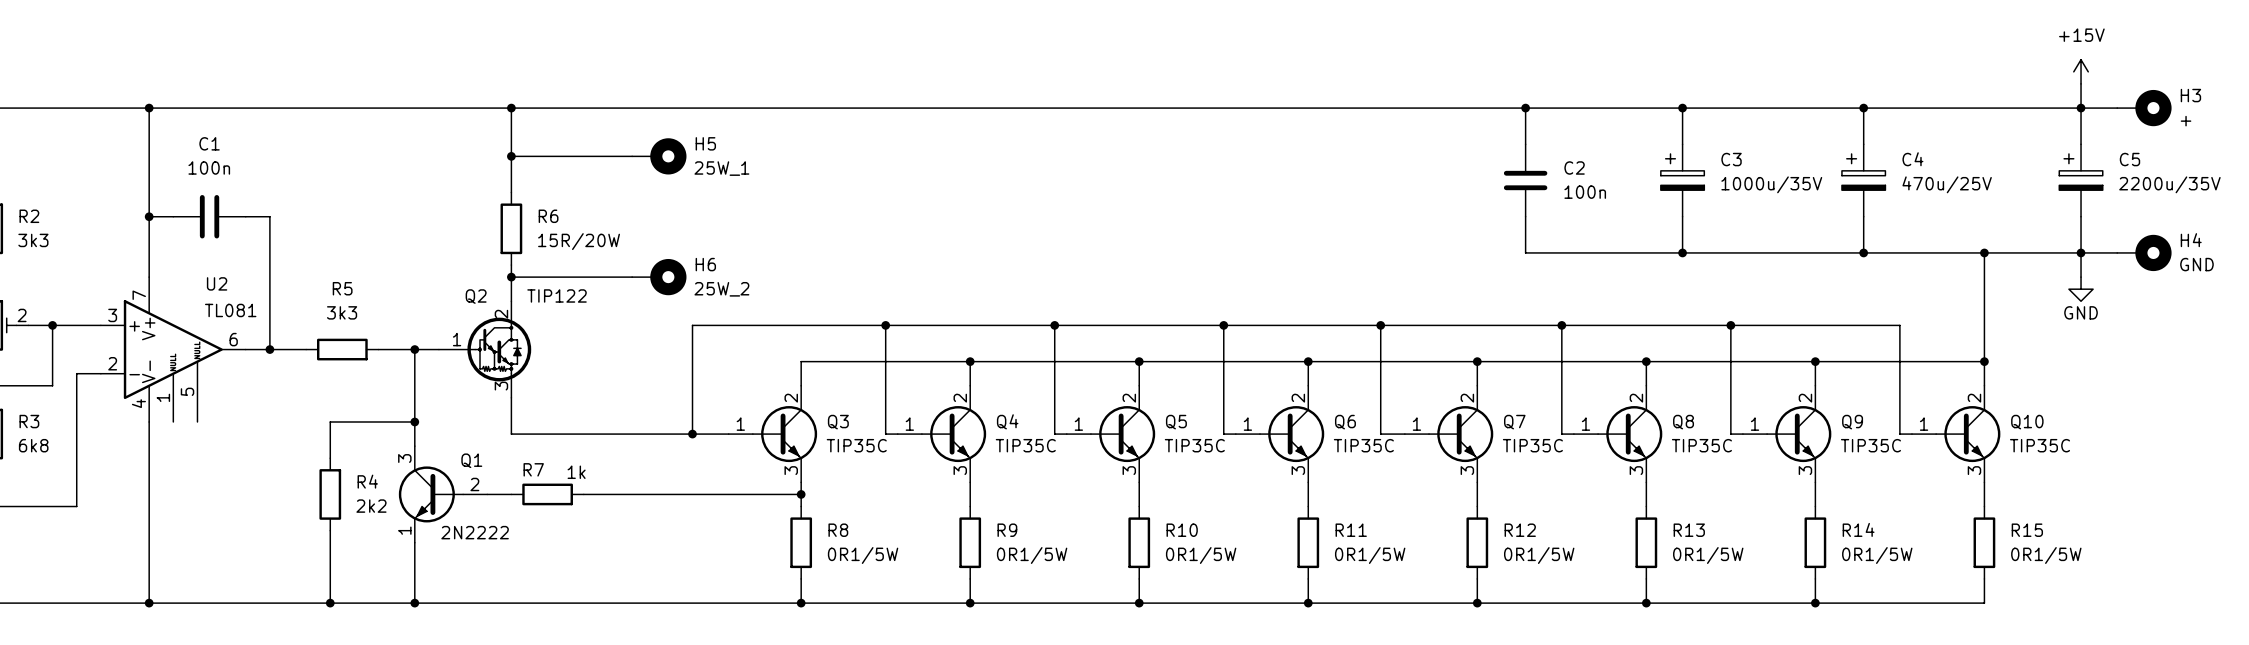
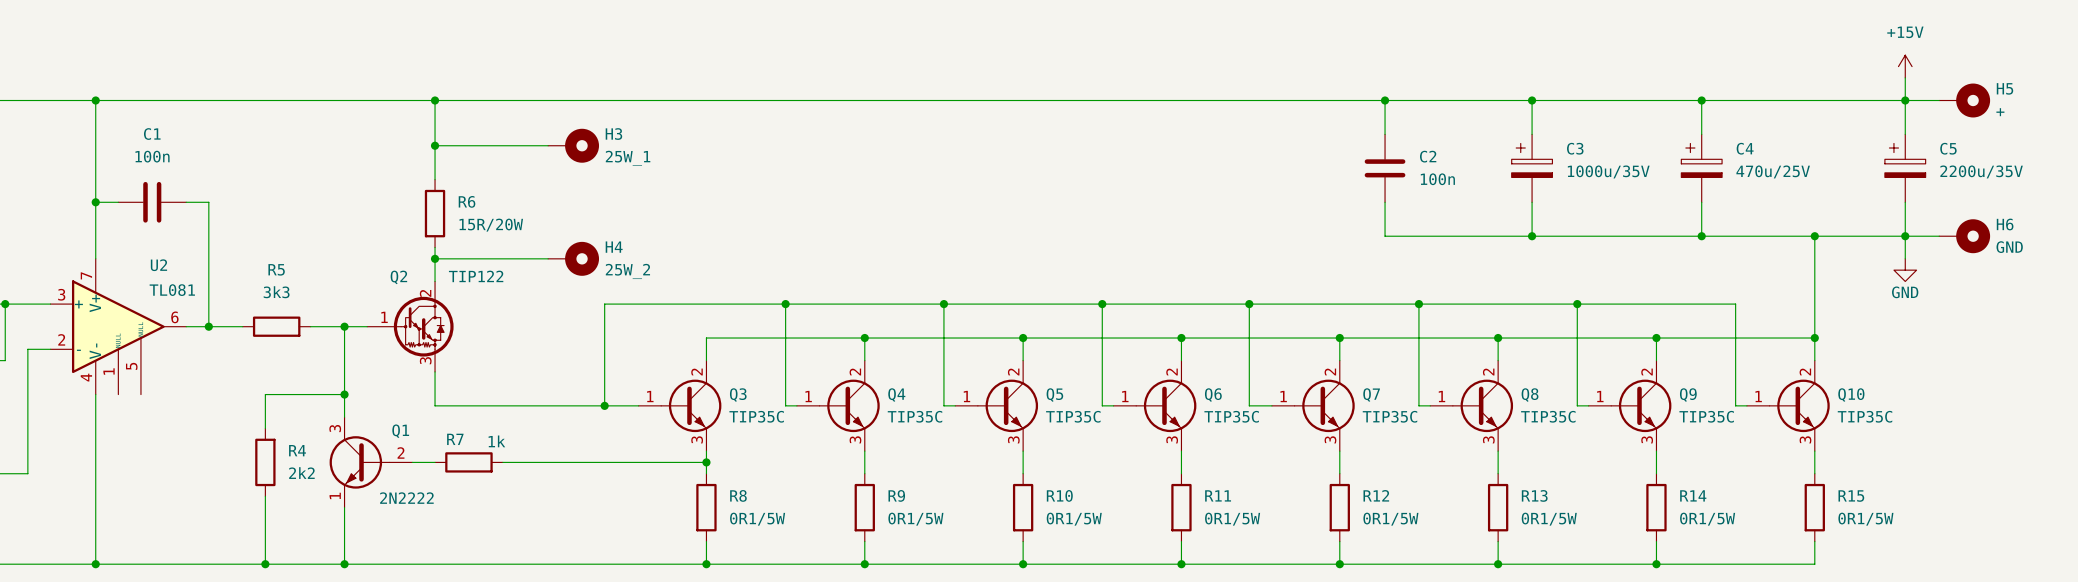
H3 name: H3 (2190, 95) -> H5 (2004, 88)
H5 name: H5 (705, 143) -> H3 (613, 134)
H4 name: H4 (2191, 240) -> H6 (2005, 224)
H6 name: H6 (705, 264) -> H4 (614, 247)

